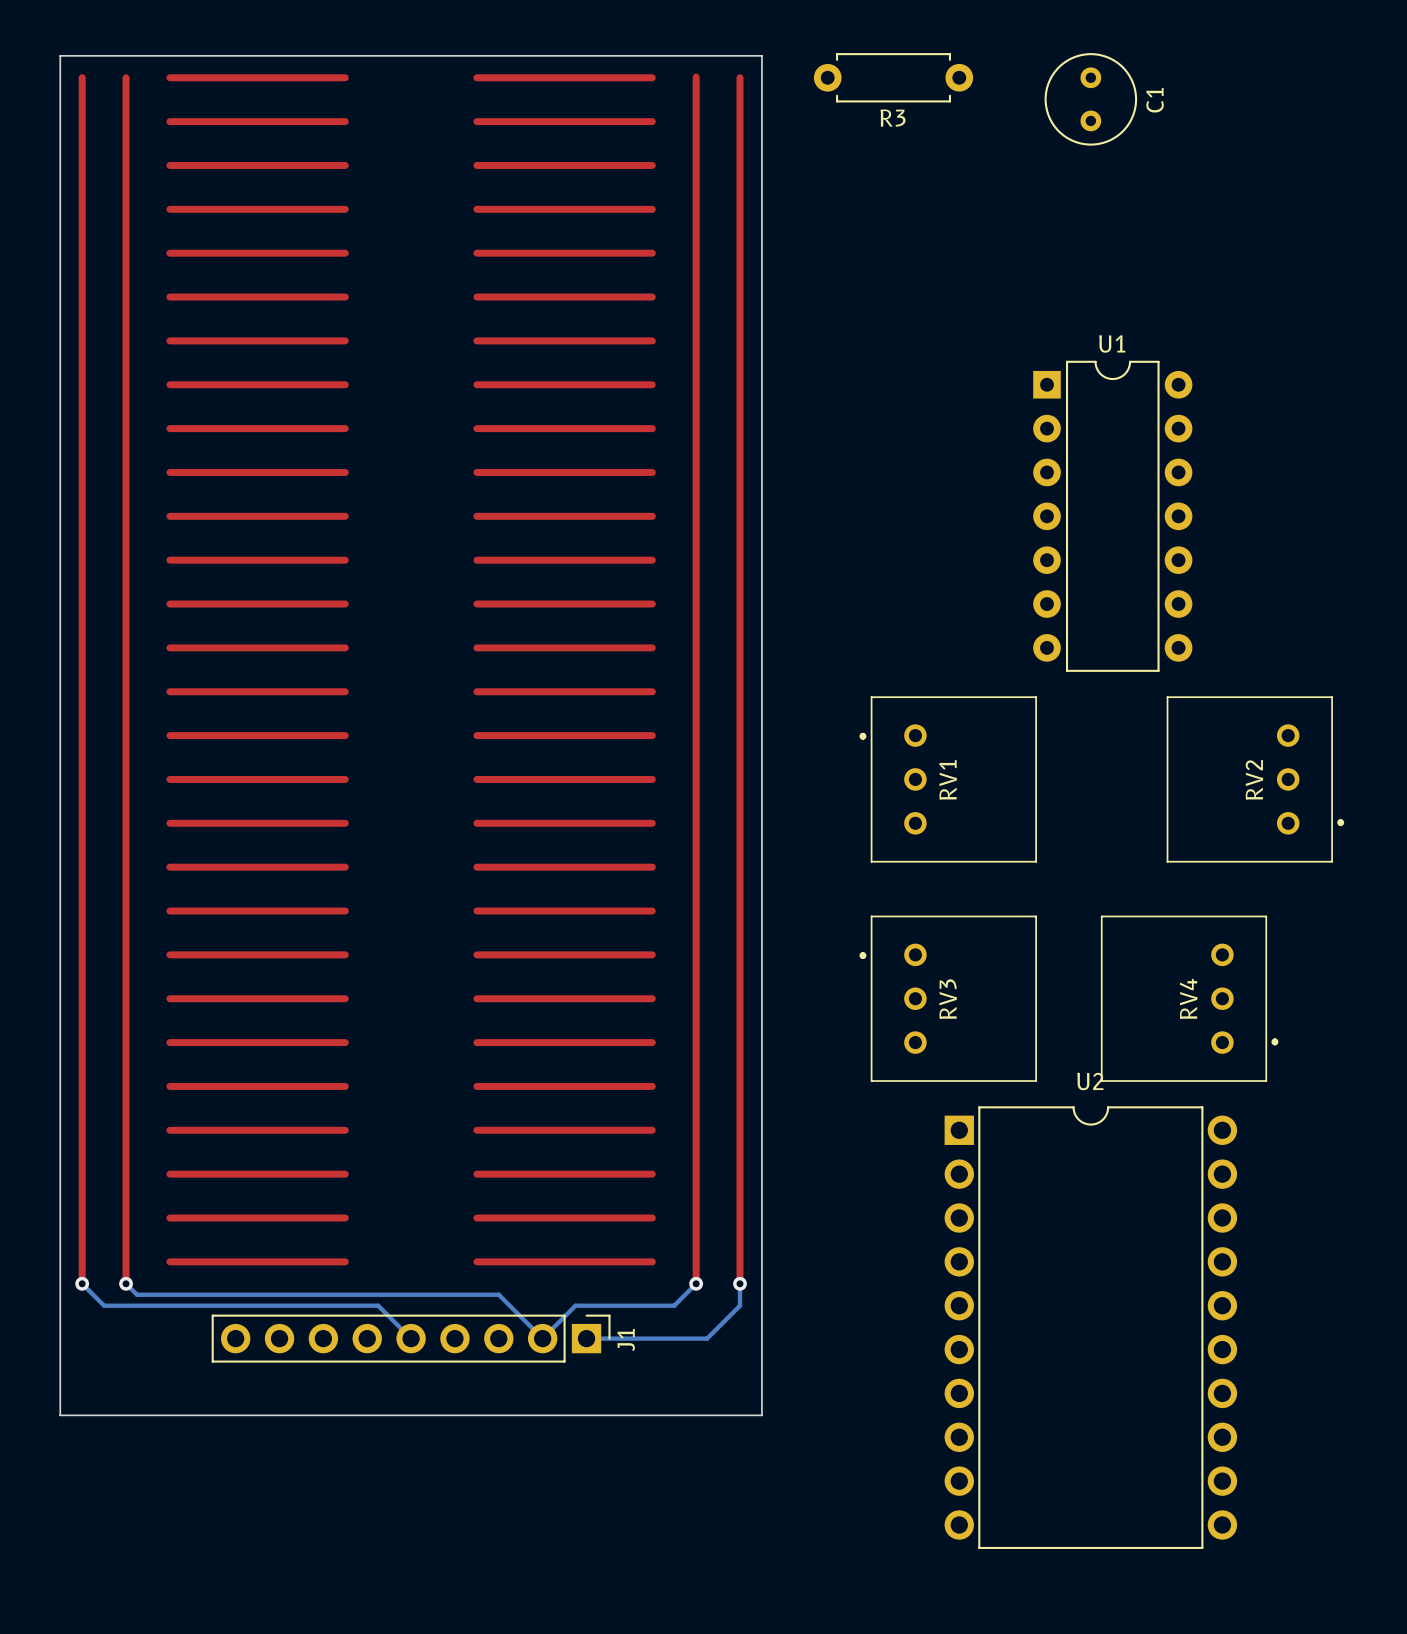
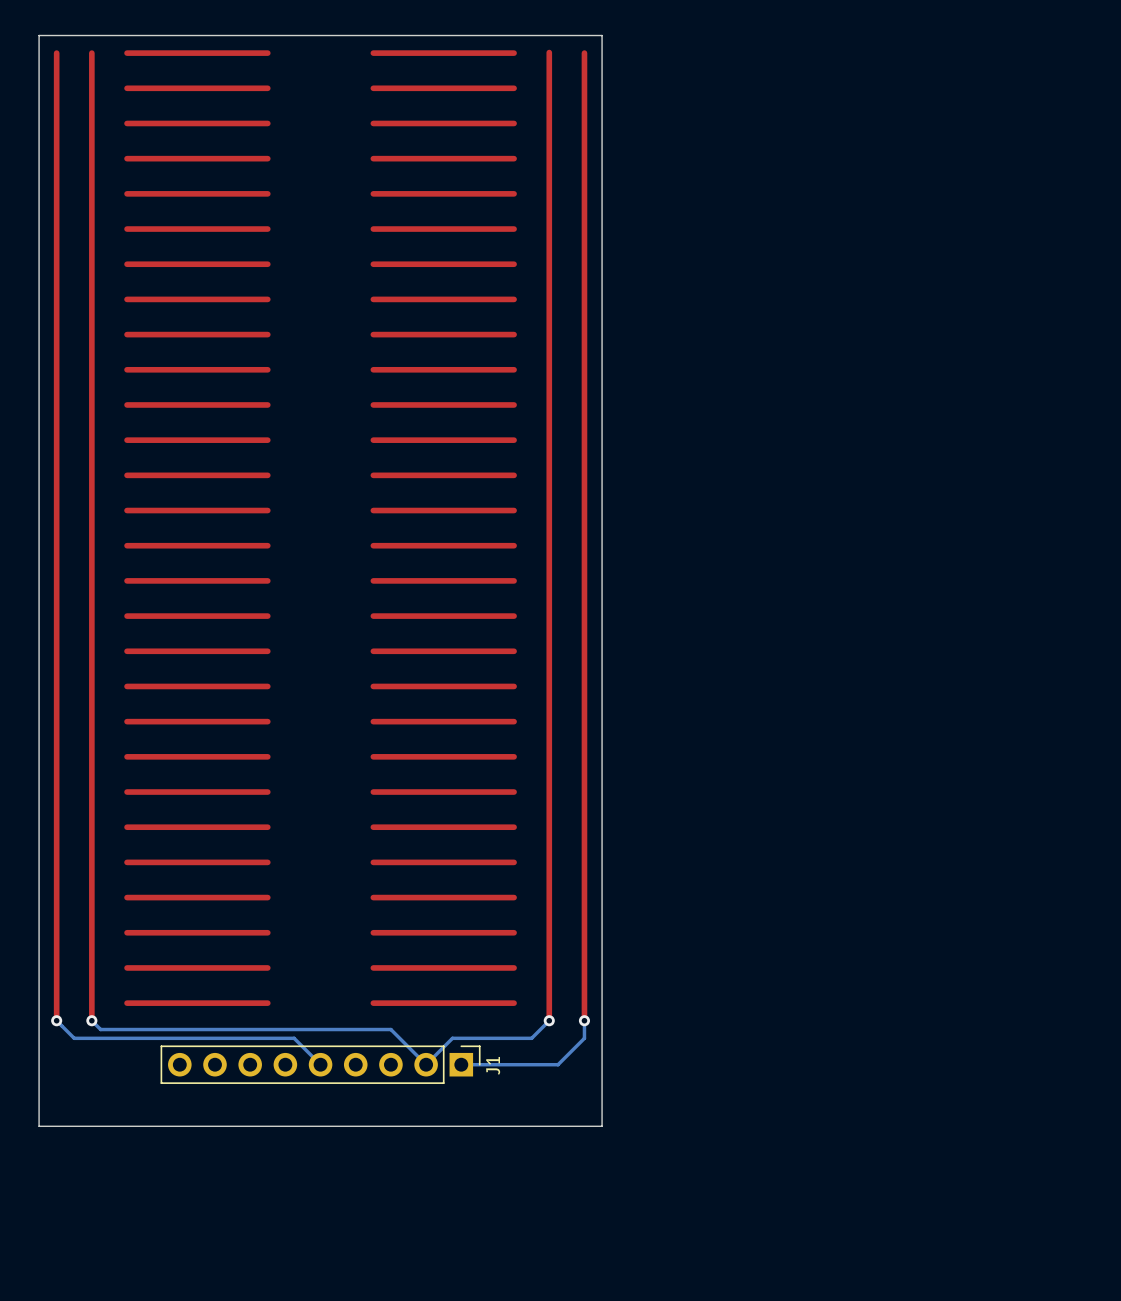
R3: (893, 77) -> none
C1: (1090, 99) -> none
U1: (1112, 516) -> none
RV1: (948, 779) -> none
RV2: (1255, 779) -> none
RV3: (948, 998) -> none
RV4: (1189, 998) -> none
U2: (1090, 1327) -> none

